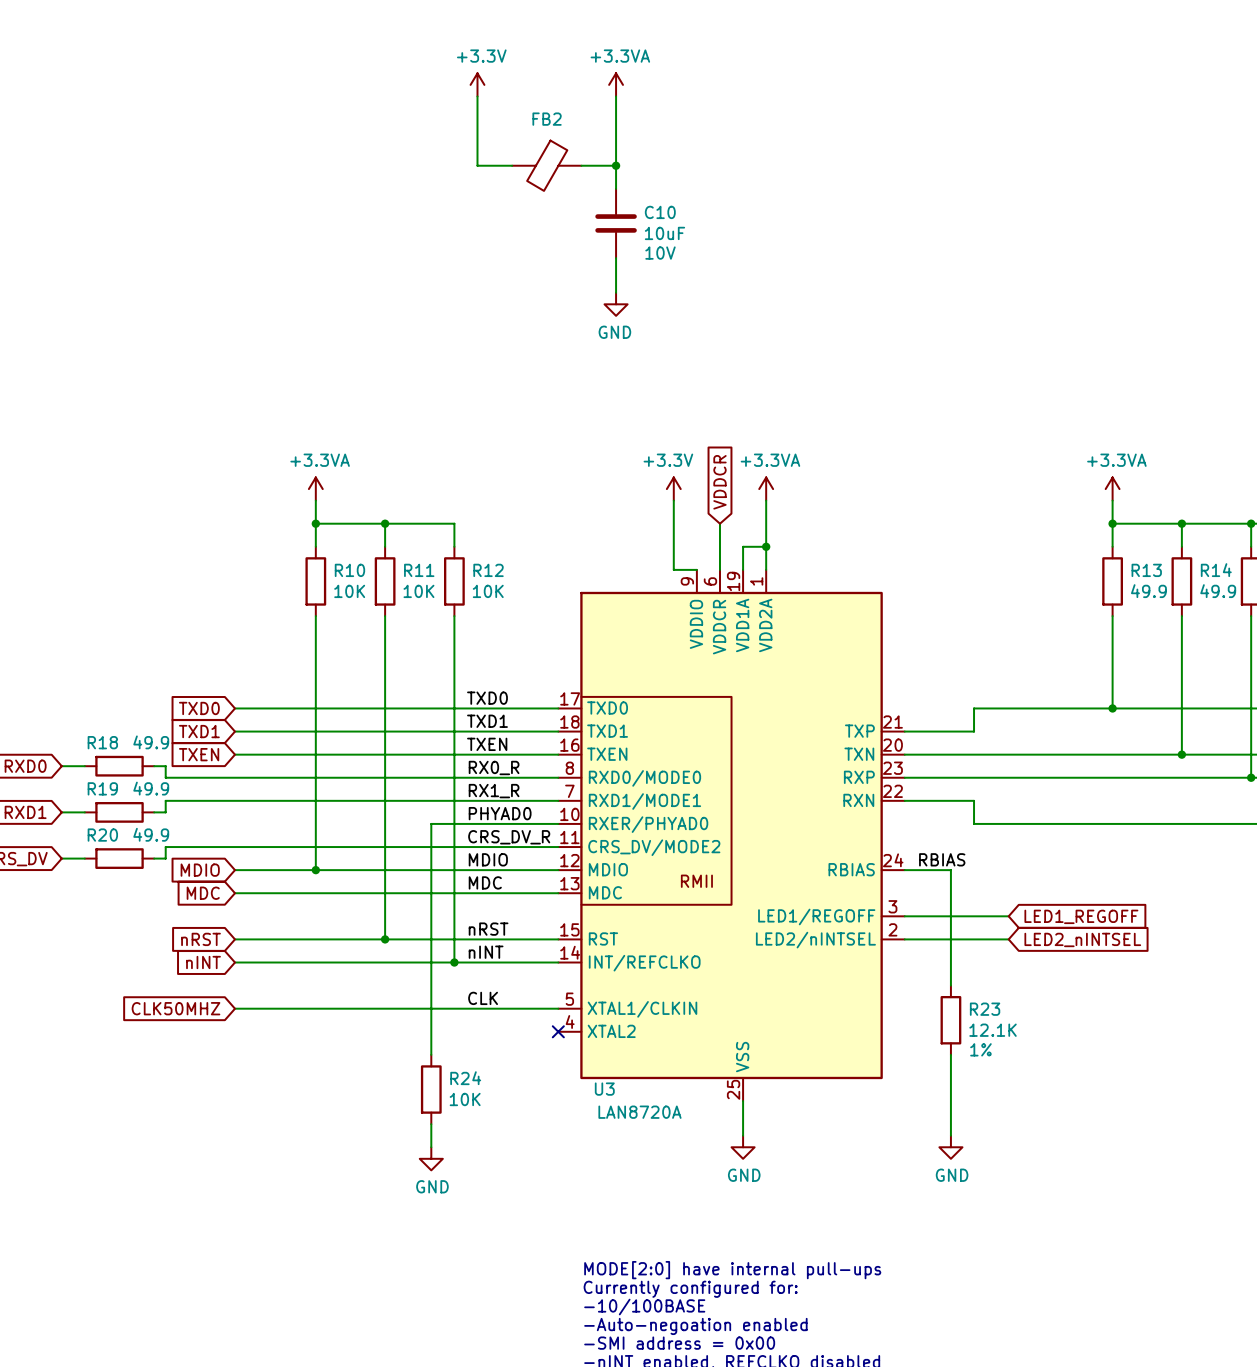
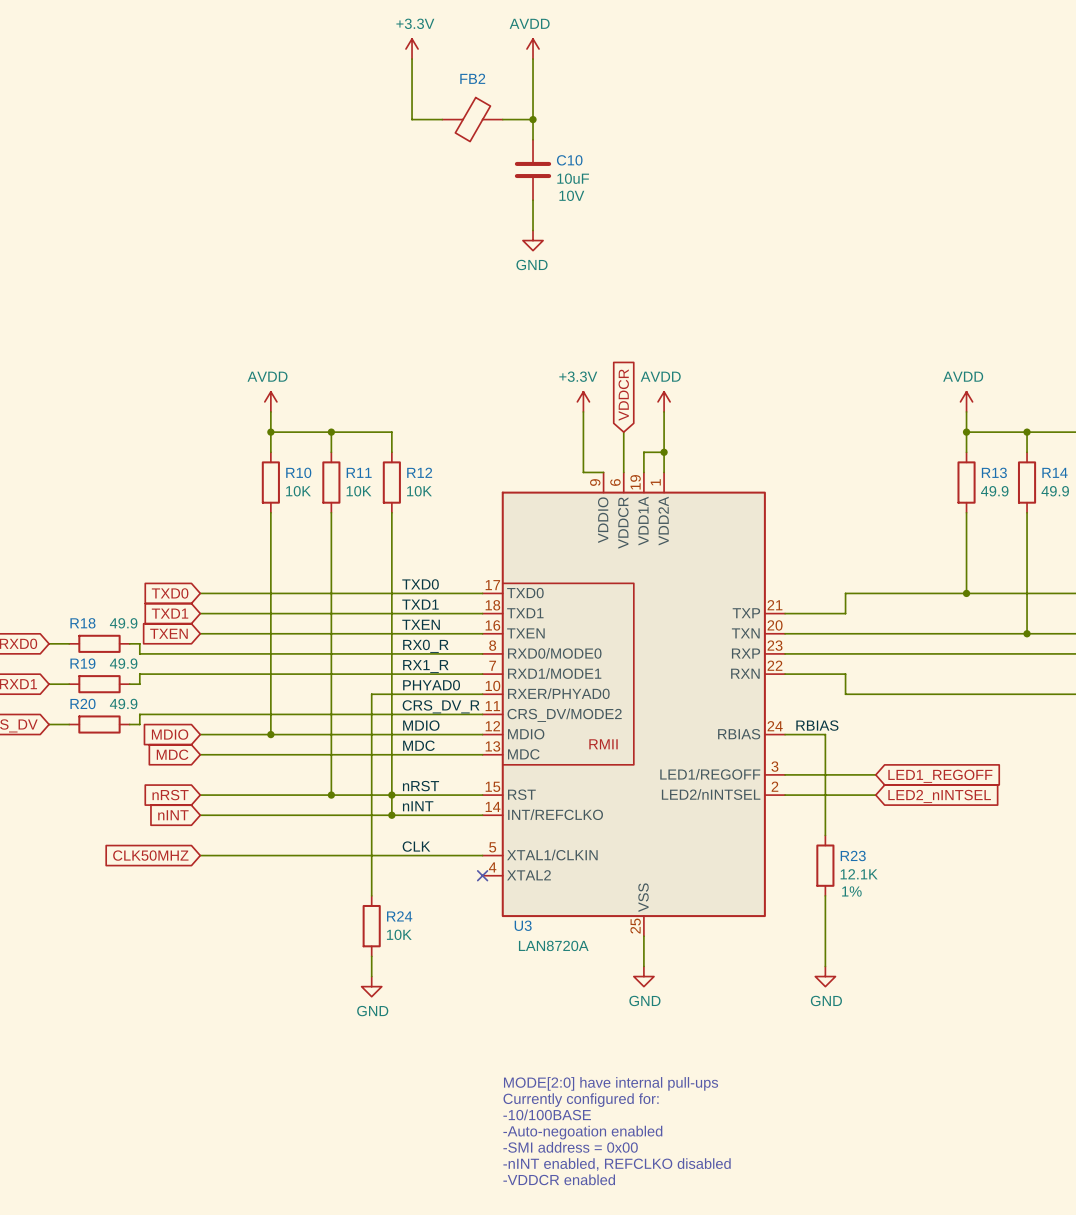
power symbol: +3.3VA (616, 84) -> AVDD (533, 49)
power symbol: +3.3VA (315, 489) -> AVDD (270, 401)
power symbol: +3.3VA (766, 489) -> AVDD (664, 401)
power symbol: +3.3VA (1112, 489) -> AVDD (966, 401)
junction: none -> (391, 795)

